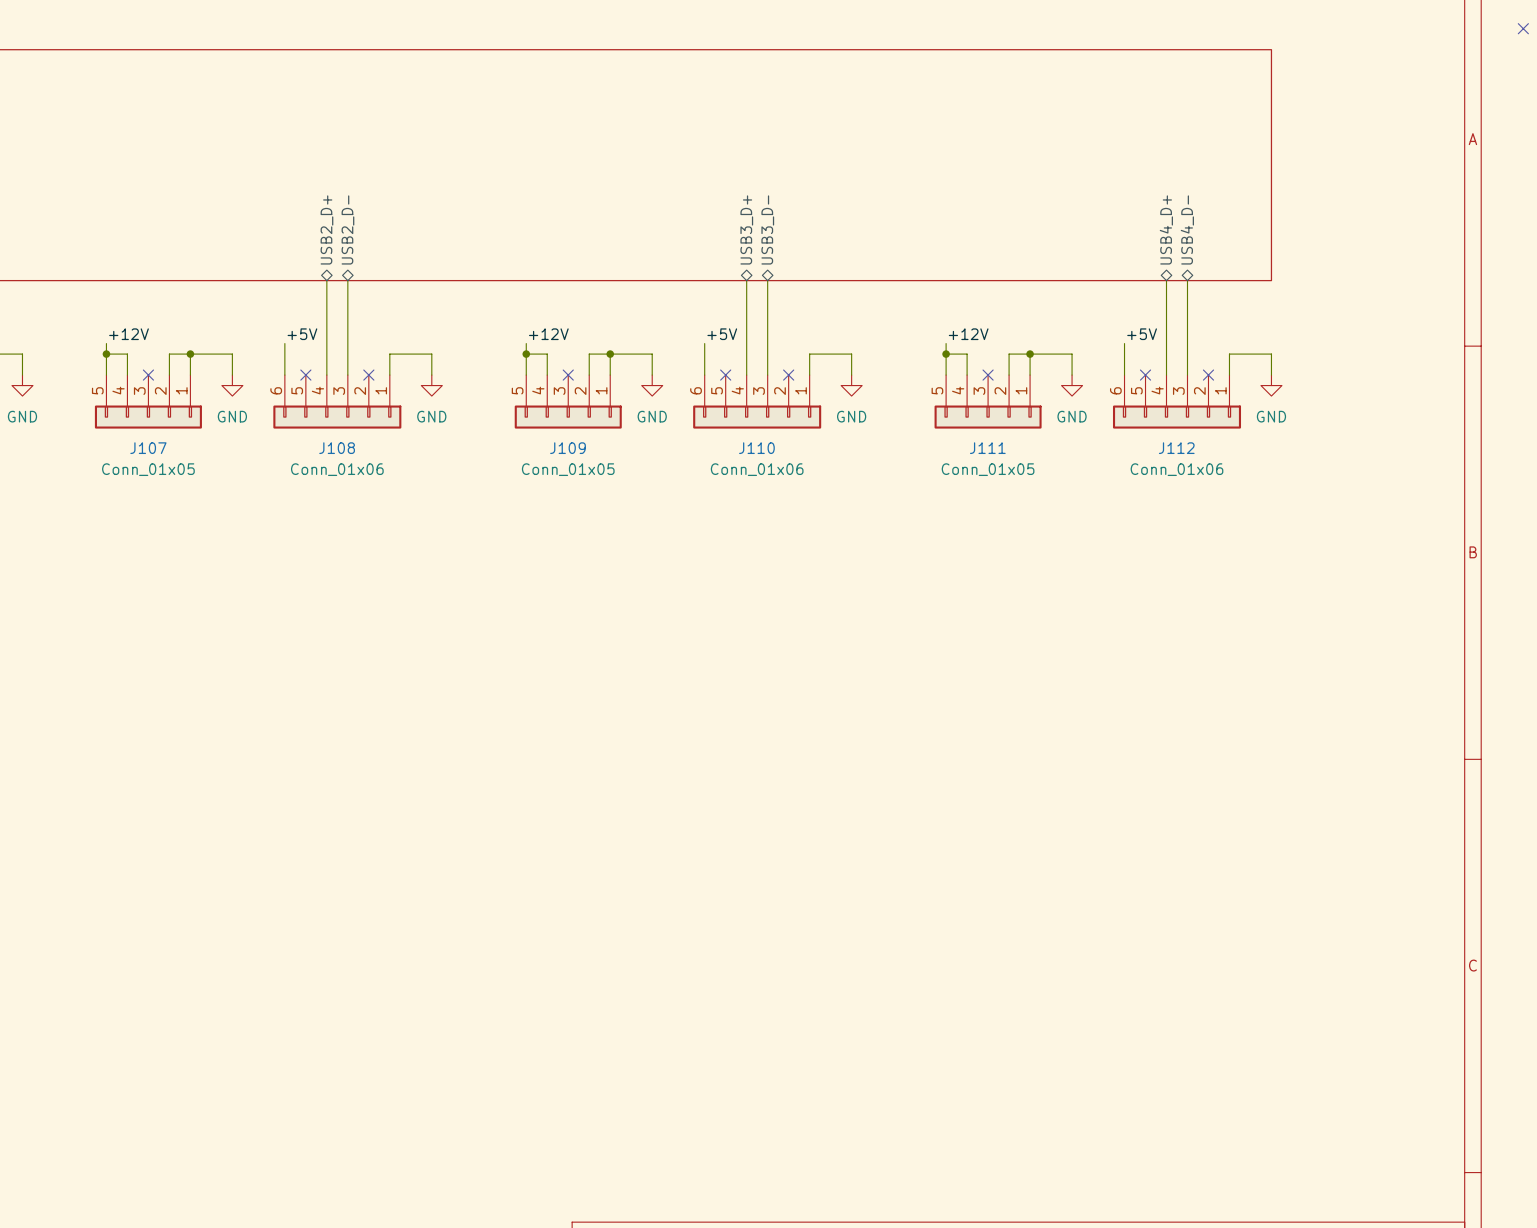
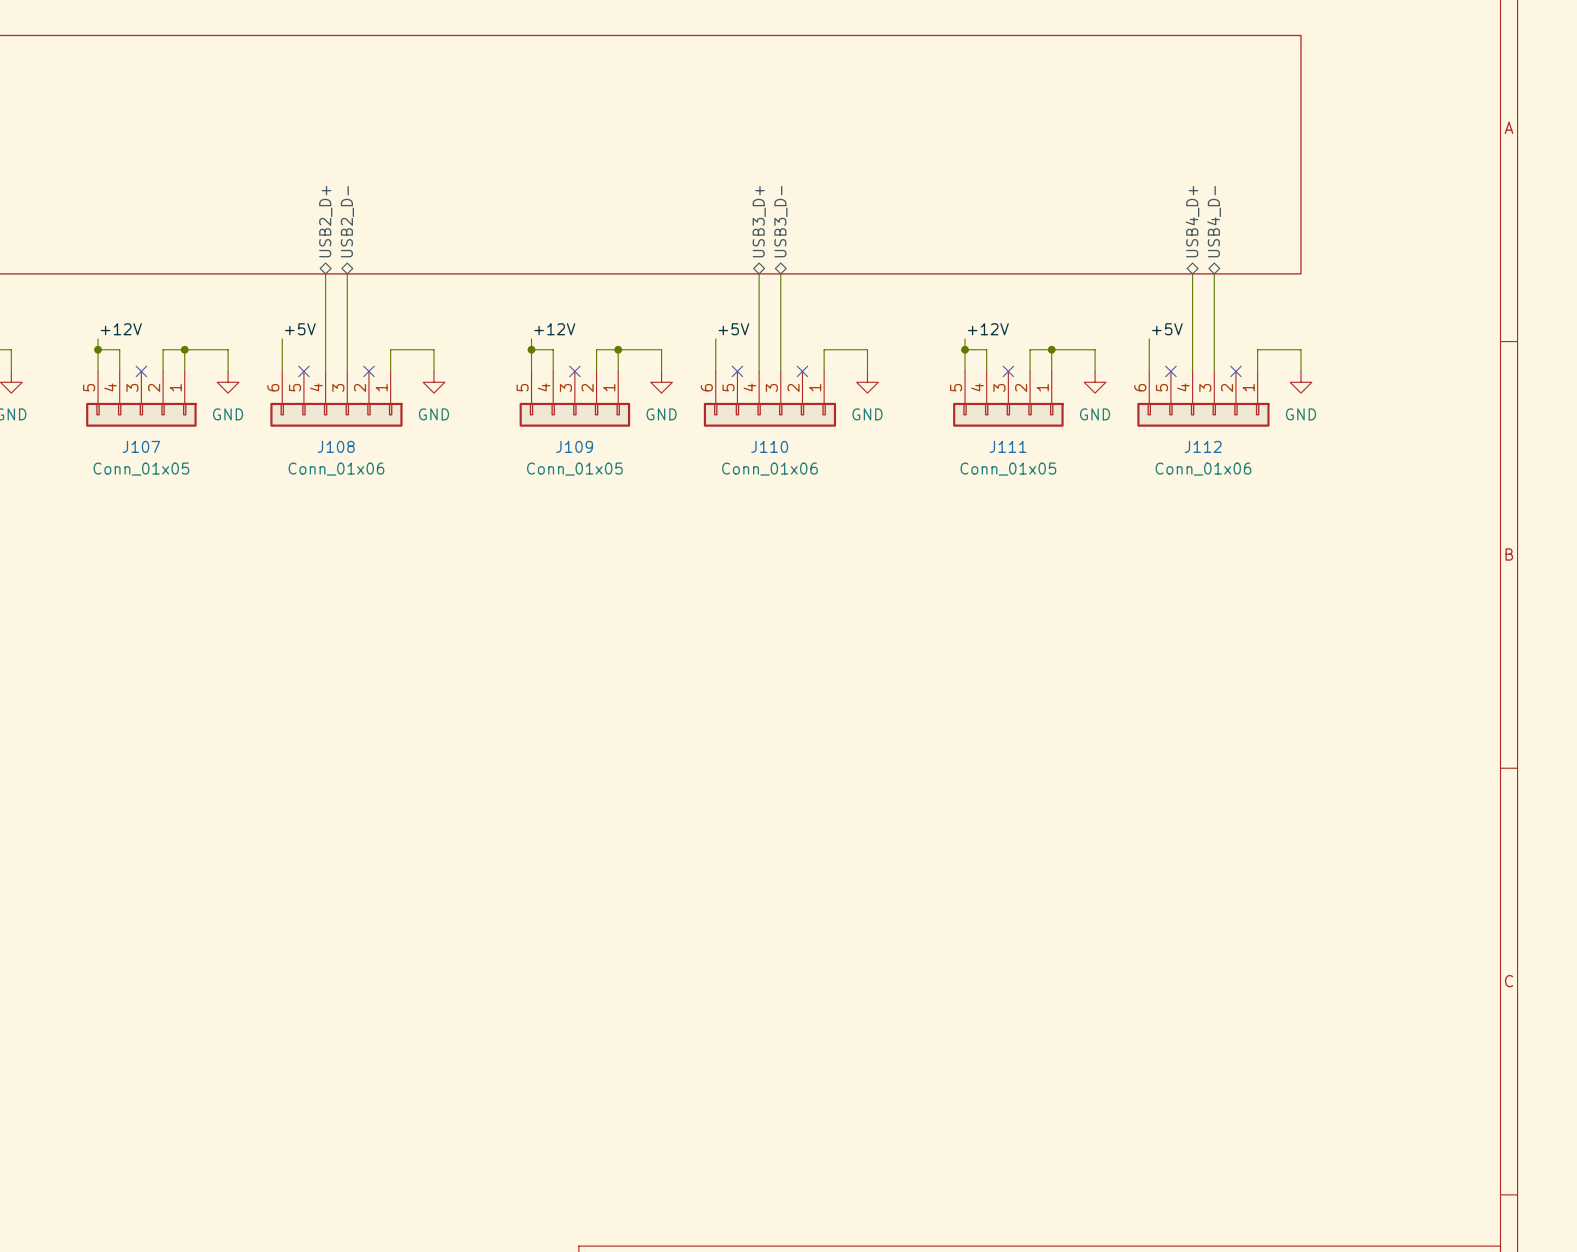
no-connect mark: (1523, 28) -> none

